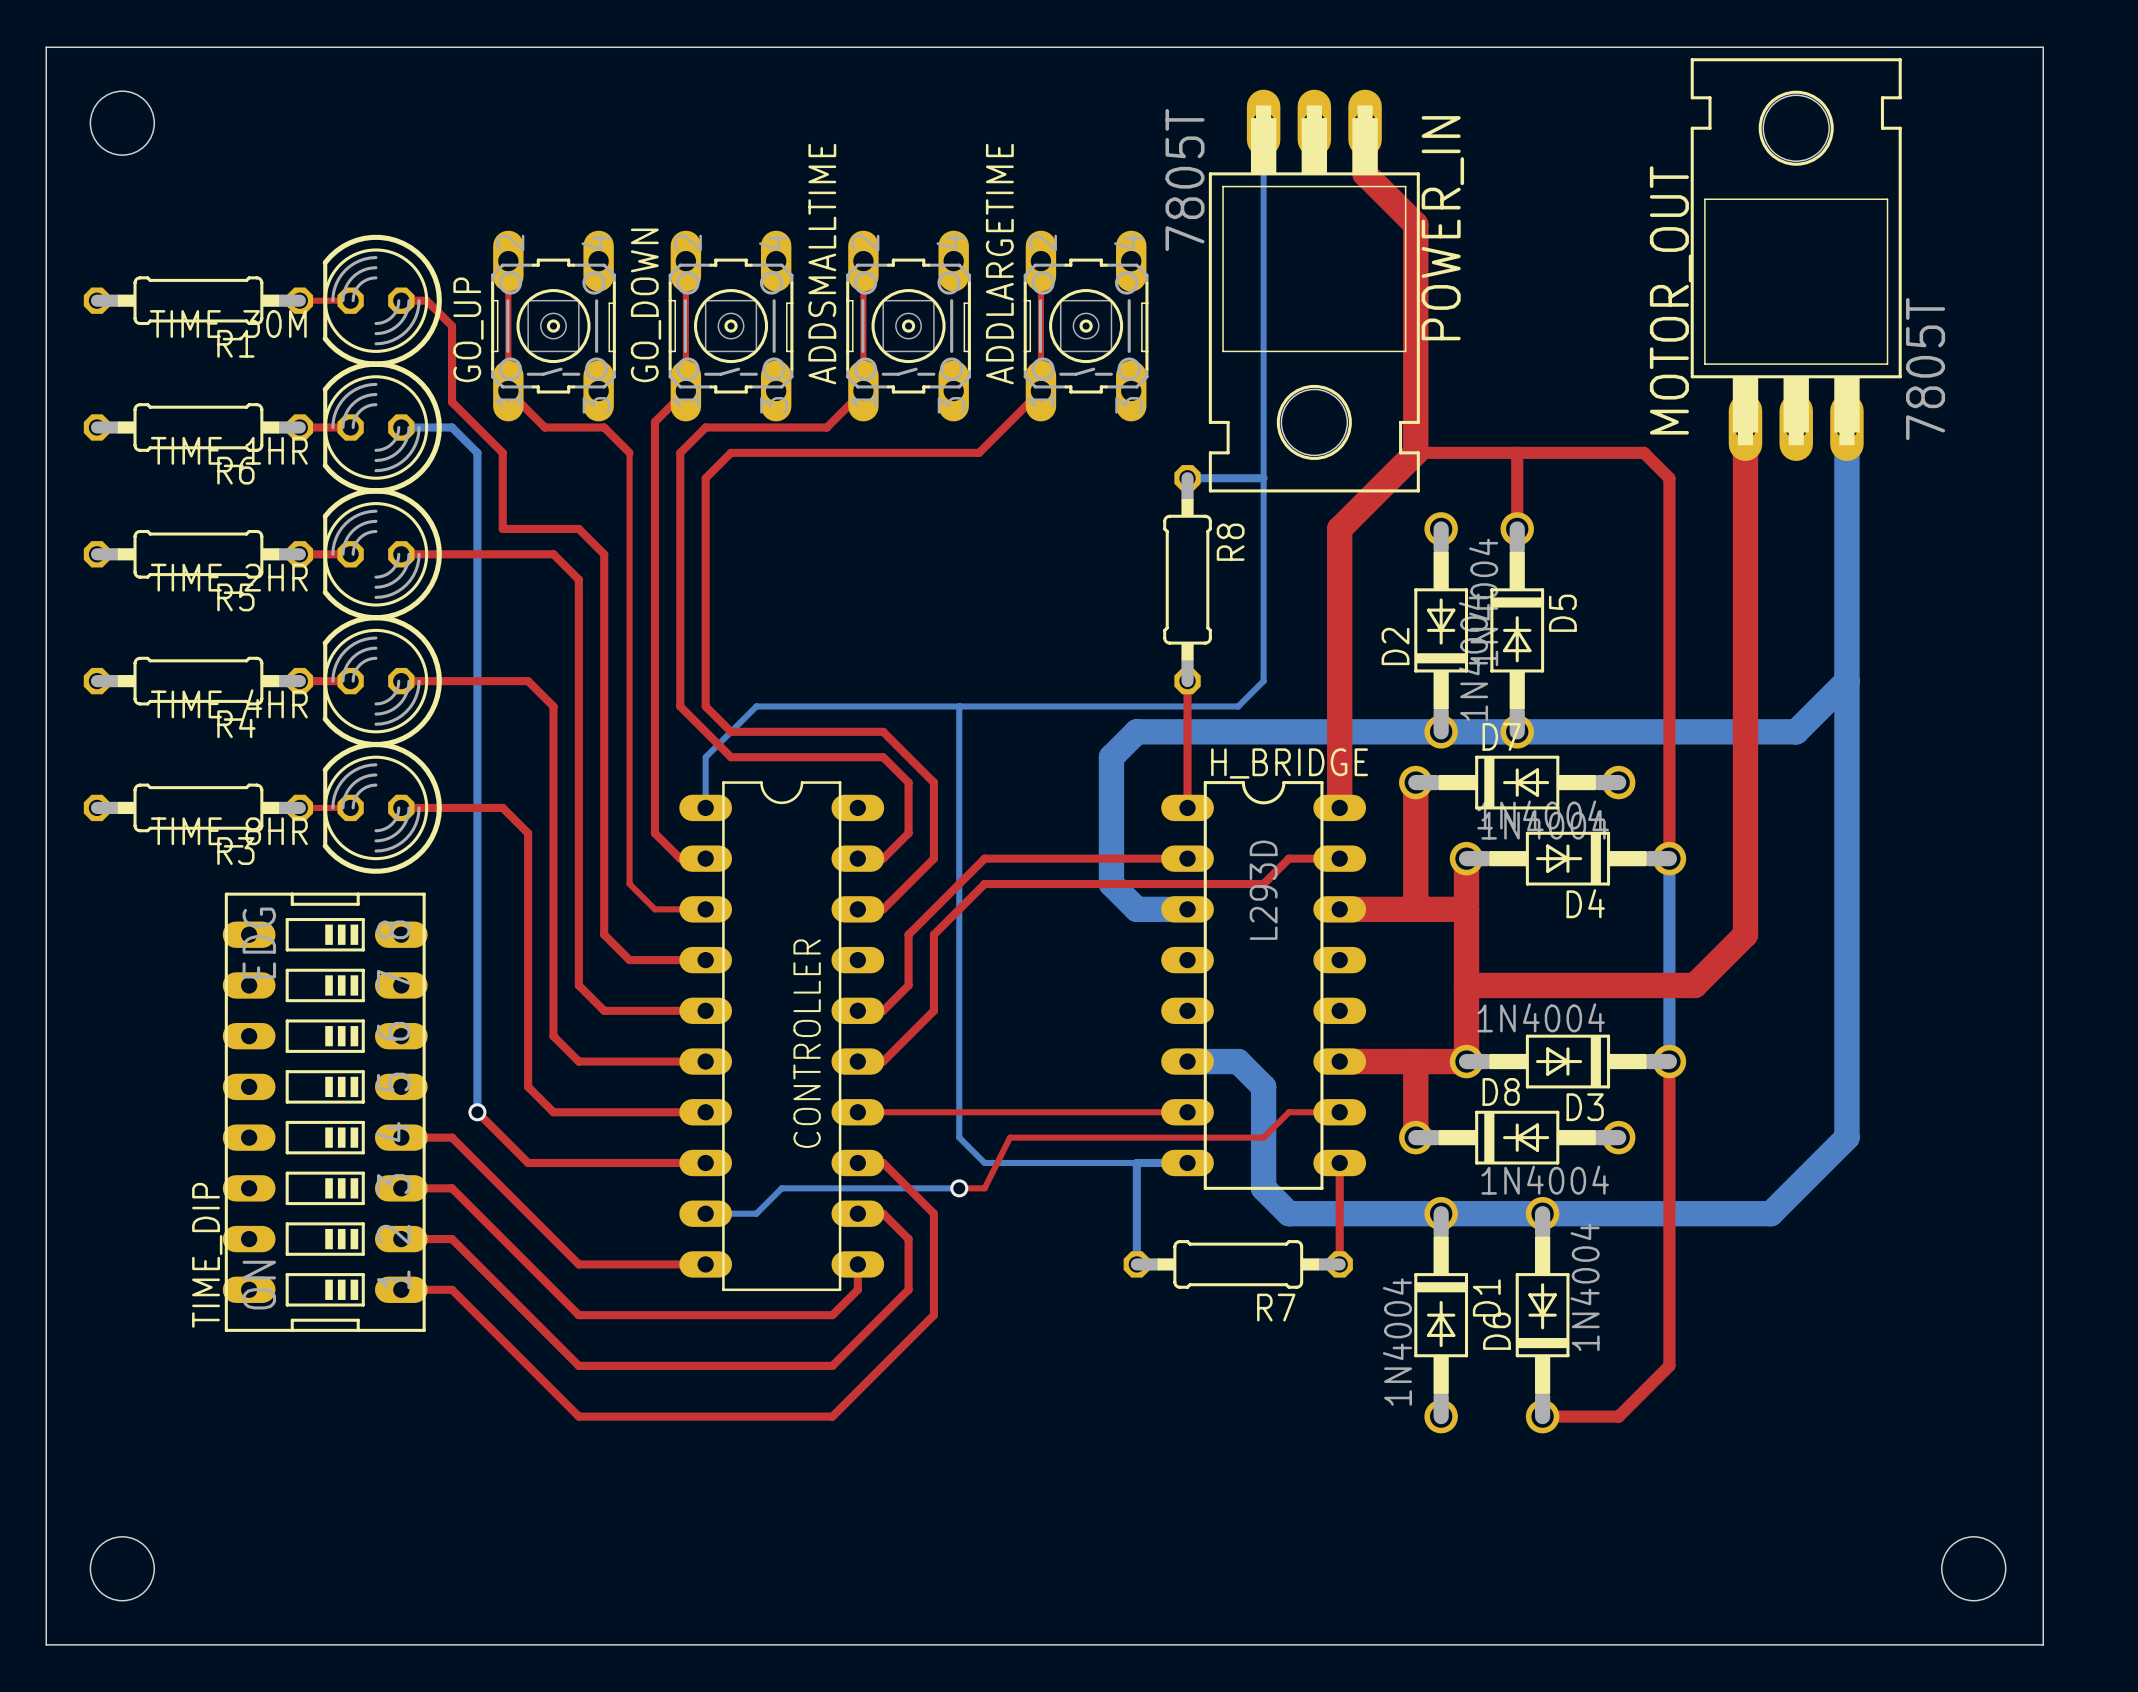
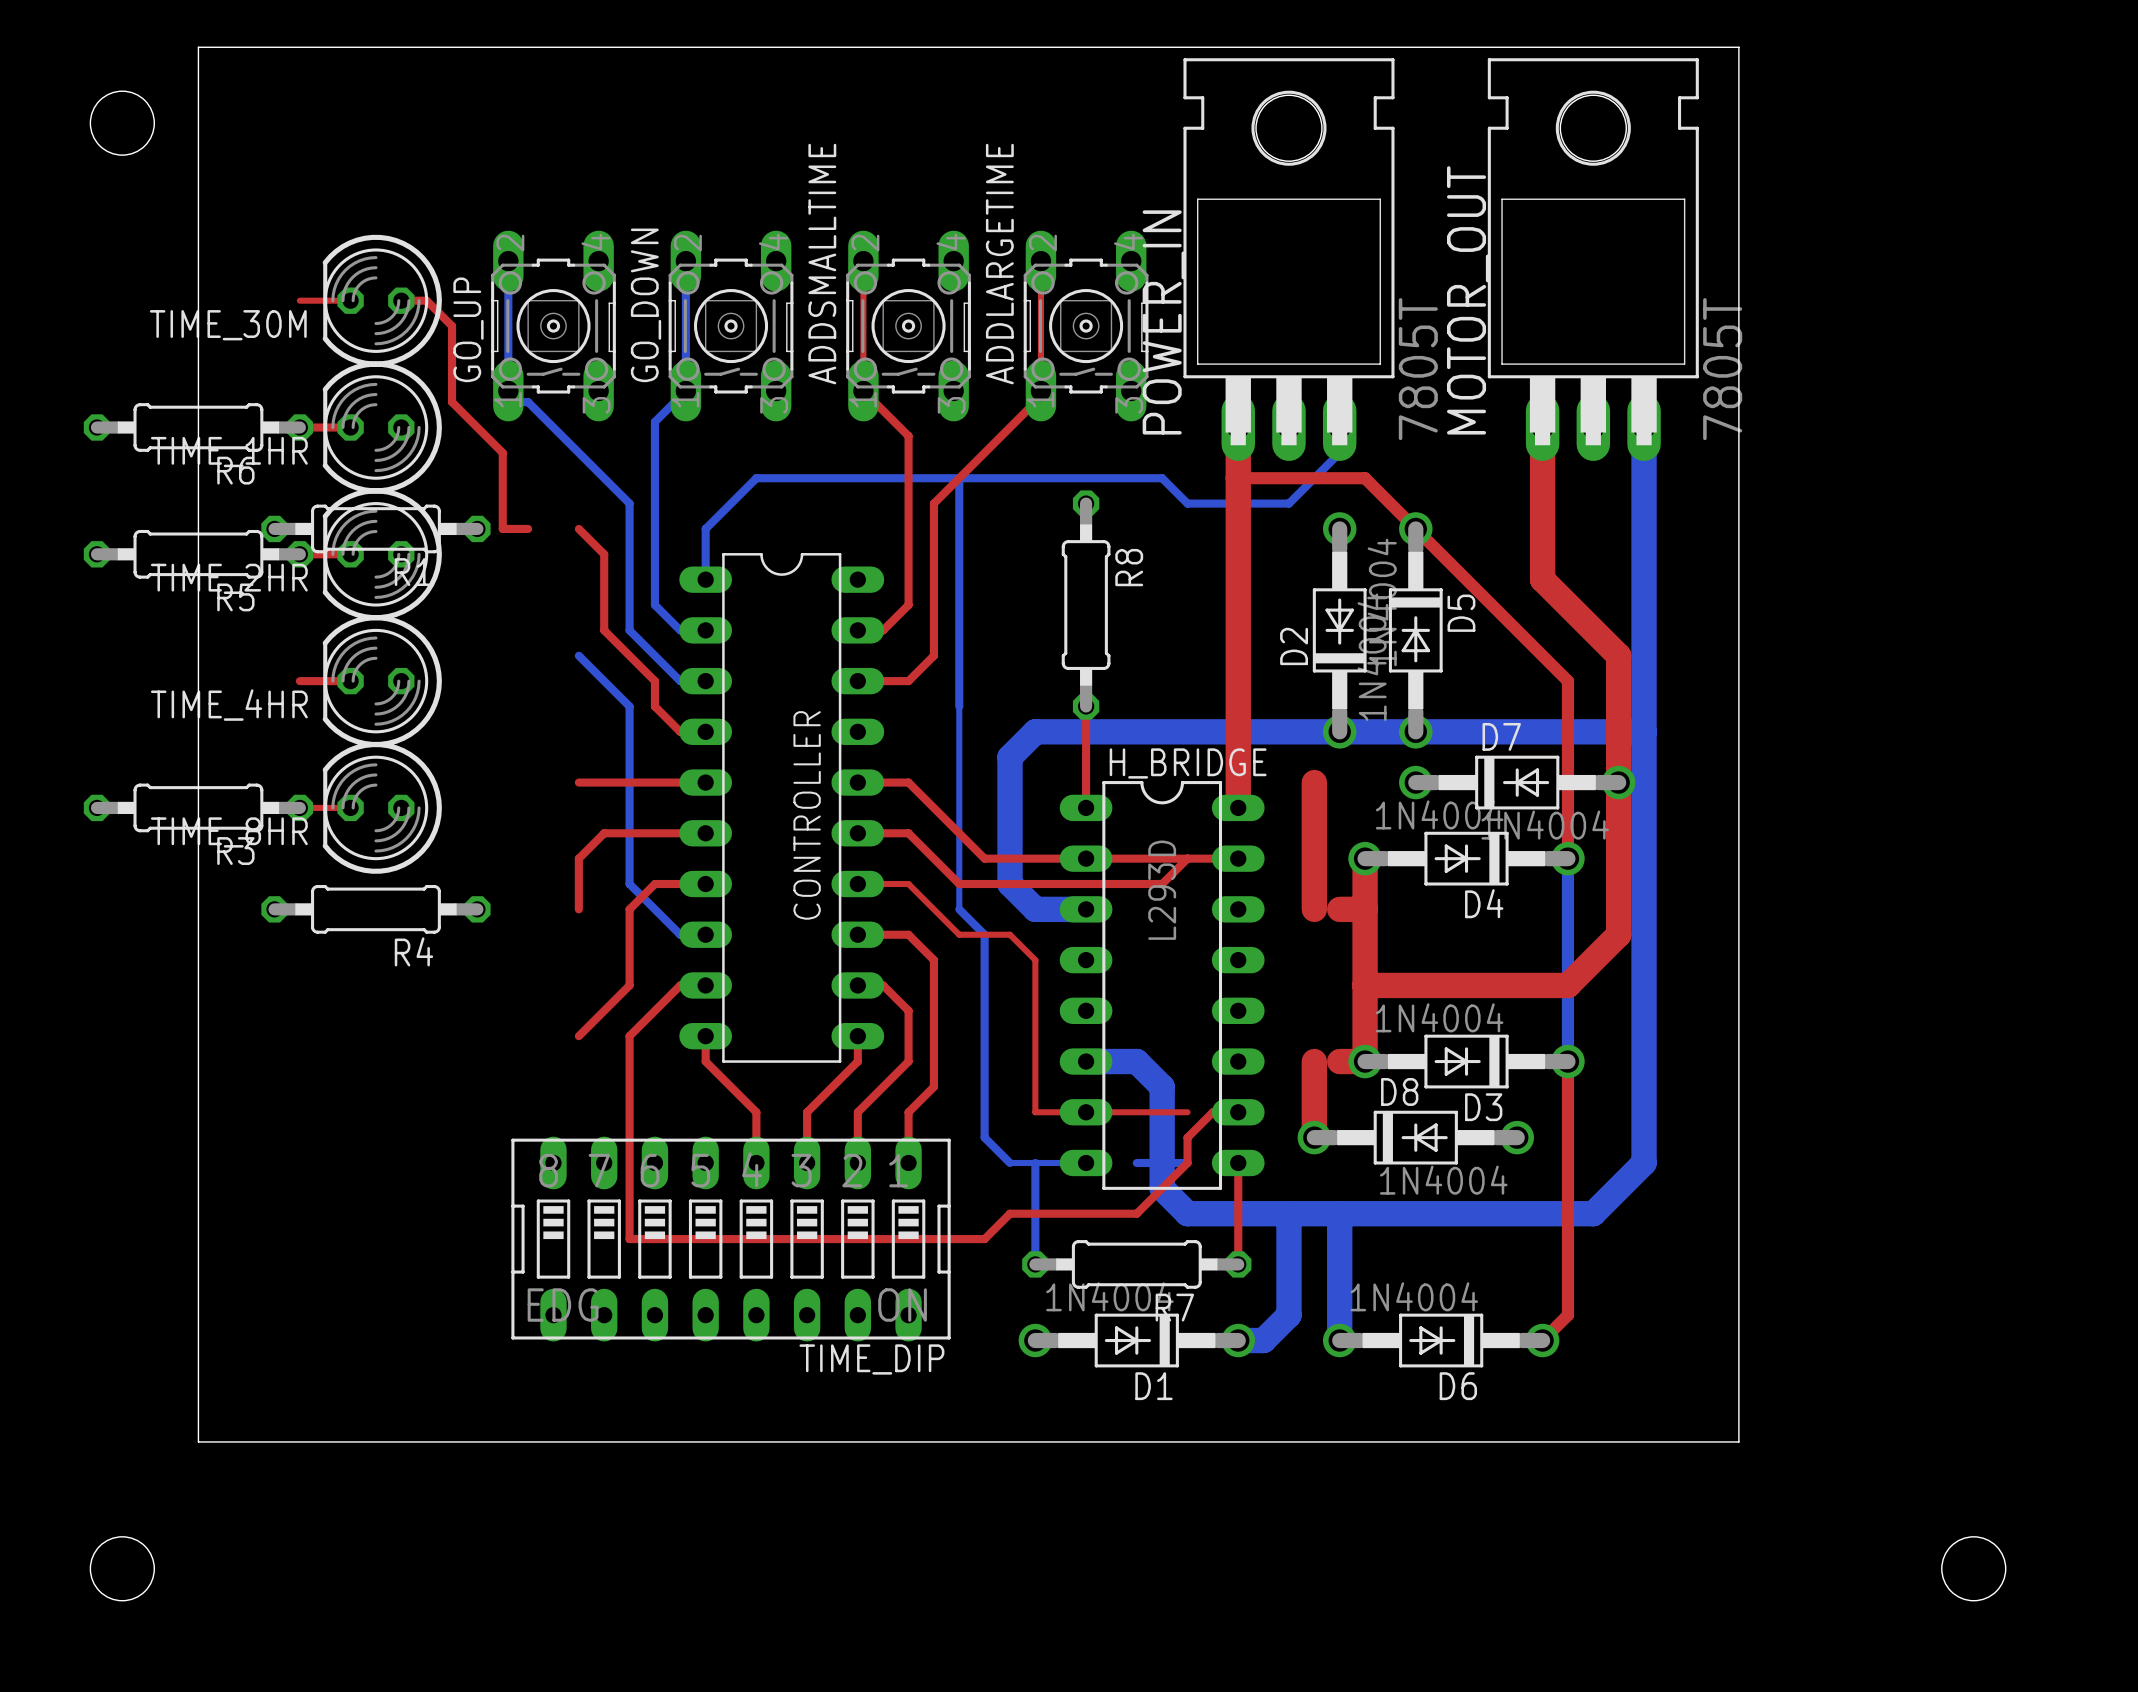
board edge: (198, 47) (46, 47) (46, 1644) (2043, 1644) (2043, 47) (1738, 47) -> (198, 47) (198, 1441) (1738, 1441) (1738, 47)
bottom track: (1263, 123) (1263, 681) (1238, 706) (756, 706) (705, 757) (705, 807) -> none
top track: (1365, 123) (1365, 173) (1415, 224) (1415, 452) -> none
MOTOR_OUT position: (1796, 259) -> (1593, 259)
top track: (508, 261) (508, 390) (544, 427) (604, 427) (629, 452) (629, 884) (654, 909) (705, 909) -> none
bottom track: none -> (508, 261) (508, 390) (519, 402) (528, 402) (629, 503) (629, 630) (680, 681) (705, 681)
top track: (685, 261) (685, 390) (654, 421) (654, 681) -> none
bottom track: none -> (685, 261) (685, 390) (654, 421) (654, 605) (680, 630) (705, 630)
POWER_IN rotation: 0° (1314, 291) -> 180° (1288, 259)
R1 position: (198, 300) -> (375, 528)
top track: (863, 390) (826, 427) (705, 427) (680, 452) (680, 706) (731, 757) (883, 757) (908, 782) (908, 833) (883, 858) (857, 858) -> (863, 390) (908, 436) (908, 605) (883, 630) (857, 630)
top track: (1035, 396) (979, 452) (731, 452) (705, 478) (705, 706) (731, 731) (883, 731) (933, 782) (933, 858) (883, 909) (857, 909) -> (1035, 396) (1035, 402) (933, 503) (933, 655) (908, 681) (857, 681)
bottom track: (401, 427) (452, 427) (477, 452) (477, 1112) -> none
top track: none -> (1238, 427) (1238, 807)
bottom track: none -> (1339, 427) (1339, 452) (1288, 503) (1187, 503) (1162, 478) (756, 478) (705, 528) (705, 579)
top track: (1745, 427) (1745, 934) (1694, 985) (1567, 985) -> (1542, 427) (1542, 579) (1618, 655) (1618, 934) (1567, 985)
bottom track: (1846, 427) (1846, 1137) (1770, 1213) (1593, 1213) -> (1644, 427) (1644, 1162) (1593, 1213)
top track: (1415, 452) (1339, 528) (1339, 807) -> none
top track: (1415, 452) (1644, 452) (1669, 478) (1669, 858) -> none
top track: (1517, 452) (1517, 528) -> none
bottom track: none -> (959, 478) (959, 706)
bottom track: (1187, 478) (1263, 478) -> none
top track: none -> (1238, 478) (1365, 478) (1567, 681) (1567, 858)
top track: (528, 528) (578, 528) -> none
top track: (401, 554) (553, 554) (578, 579) (578, 858) -> (705, 833) (604, 833) (578, 858)
R8 position: (1187, 579) -> (1086, 605)
top track: (604, 630) (604, 934) (629, 960) (705, 960) -> (604, 630) (654, 681)
D2 position: (1441, 630) -> (1339, 630)
D5 position: (1517, 630) -> (1415, 630)
bottom track: none -> (578, 655) (629, 706) (629, 884) (680, 934) (705, 934)
R4 position: (198, 681) -> (375, 909)
top track: (401, 681) (528, 681) (553, 706) (553, 1036) (578, 1061) (705, 1061) -> none
top track: (1187, 681) (1187, 807) -> none
bottom track: (1846, 681) (1796, 731) (1644, 731) -> none
top track: (654, 706) (654, 833) (680, 858) (705, 858) -> (654, 706) (680, 731) (705, 731)
top track: none -> (1086, 706) (1086, 807)
bottom track: (1136, 731) (1111, 757) (1111, 884) (1136, 909) (1187, 909) -> (1136, 731) (1035, 731) (1010, 757) (1010, 884) (1035, 909) (1086, 909)
top track: none -> (578, 782) (705, 782)
top track: (1415, 782) (1415, 909) -> (1314, 782) (1314, 909)
top track: (401, 807) (502, 807) (528, 833) (528, 1086) (553, 1112) (705, 1112) -> none
top track: none -> (857, 833) (908, 833) (959, 884) (984, 884)
top track: (984, 858) (908, 934) (908, 985) (883, 1010) (857, 1010) -> (984, 858) (908, 782) (857, 782)
top track: (1339, 858) (1288, 858) (1263, 884) (1162, 884) -> (1238, 858) (1187, 858) (1162, 884)
top track: (1466, 858) (1466, 1061) (1365, 1061) -> (1365, 858) (1365, 1061)
D4 position: (1567, 858) -> (1466, 858)
bottom track: (1669, 858) (1669, 1061) -> (1567, 858) (1567, 1061)
top track: none -> (705, 884) (654, 884) (629, 909) (629, 985) (578, 1036)
top track: (984, 884) (933, 934) (933, 960) -> (857, 934) (908, 934) (933, 960)
top track: (578, 909) (578, 985) (604, 1010) (705, 1010) -> none
bottom track: (959, 909) (959, 1137) (984, 1162) (1010, 1162) -> (959, 909) (984, 934) (984, 1137) (1010, 1162)
top track: (1365, 909) (1466, 909) -> (1365, 985) (1466, 985)
top track: none -> (705, 985) (680, 985) (629, 1036) (629, 1239) (984, 1239) (1010, 1213) (1136, 1213) (1187, 1162) (1187, 1137) (1212, 1112) (1238, 1112)
H_BRIDGE position: (1263, 985) -> (1162, 985)
top track: (933, 1010) (883, 1061) (857, 1061) -> (933, 1010) (933, 1086) (908, 1112) (908, 1162)
top track: none -> (705, 1036) (705, 1061) (756, 1112) (756, 1162)
CONTROLLER position: (781, 1036) -> (781, 807)
top track: none -> (857, 1036) (857, 1061) (807, 1112) (807, 1162)
bottom track: none -> (1086, 1061) (1136, 1061) (1162, 1086) (1162, 1188) (1187, 1213) (1288, 1213) (1288, 1315) (1263, 1340) (1238, 1340)
bottom track: (1187, 1061) (1238, 1061) (1263, 1086) (1263, 1188) (1288, 1213) -> none
top track: (1415, 1061) (1415, 1137) -> (1314, 1061) (1314, 1137)
top track: none -> (1567, 1061) (1567, 1315) (1542, 1340)
D3 position: (1567, 1061) -> (1466, 1061)
top track: (1669, 1061) (1669, 1365) (1618, 1416) (1542, 1416) -> none
TIME_DIP: (325, 1112) -> none
top track: (477, 1112) (528, 1162) (705, 1162) -> none
via: (477, 1112) -> none
top track: (857, 1112) (1035, 1112) -> (857, 884) (908, 884) (959, 934) (1010, 934) (1035, 960) (1035, 1112)
top track: (1339, 1112) (1288, 1112) (1263, 1137) (1010, 1137) (984, 1188) (959, 1188) -> none
top track: (401, 1137) (452, 1137) (578, 1264) (705, 1264) -> none
D8 position: (1517, 1137) -> (1415, 1137)
top track: (857, 1162) (883, 1162) (933, 1213) (933, 1315) (832, 1416) (578, 1416) (452, 1289) (401, 1289) -> (857, 1162) (857, 1112) (908, 1061) (908, 1010) (883, 985) (857, 985)
bottom track: none -> (1035, 1162) (1035, 1264)
bottom track: (1086, 1162) (1136, 1162) (1136, 1264) -> none
top track: (1339, 1162) (1339, 1264) -> (1238, 1162) (1238, 1264)
top track: (401, 1188) (452, 1188) (578, 1315) (832, 1315) (857, 1289) (857, 1264) -> none
bottom track: (959, 1188) (781, 1188) (756, 1213) (705, 1213) -> none
via: (959, 1188) -> none
top track: (857, 1213) (883, 1213) (908, 1239) (908, 1289) (832, 1365) (578, 1365) (452, 1239) (401, 1239) -> none
bottom track: none -> (1339, 1213) (1339, 1340)
TIME_DIP: none -> (731, 1239)
R7 position: (1238, 1264) -> (1136, 1264)
D1 rotation: 0° (1441, 1315) -> 90° clockwise (1136, 1340)
D1 position: (1441, 1315) -> (1136, 1340)
D6 rotation: 0° (1542, 1315) -> 90° counterclockwise (1441, 1340)

